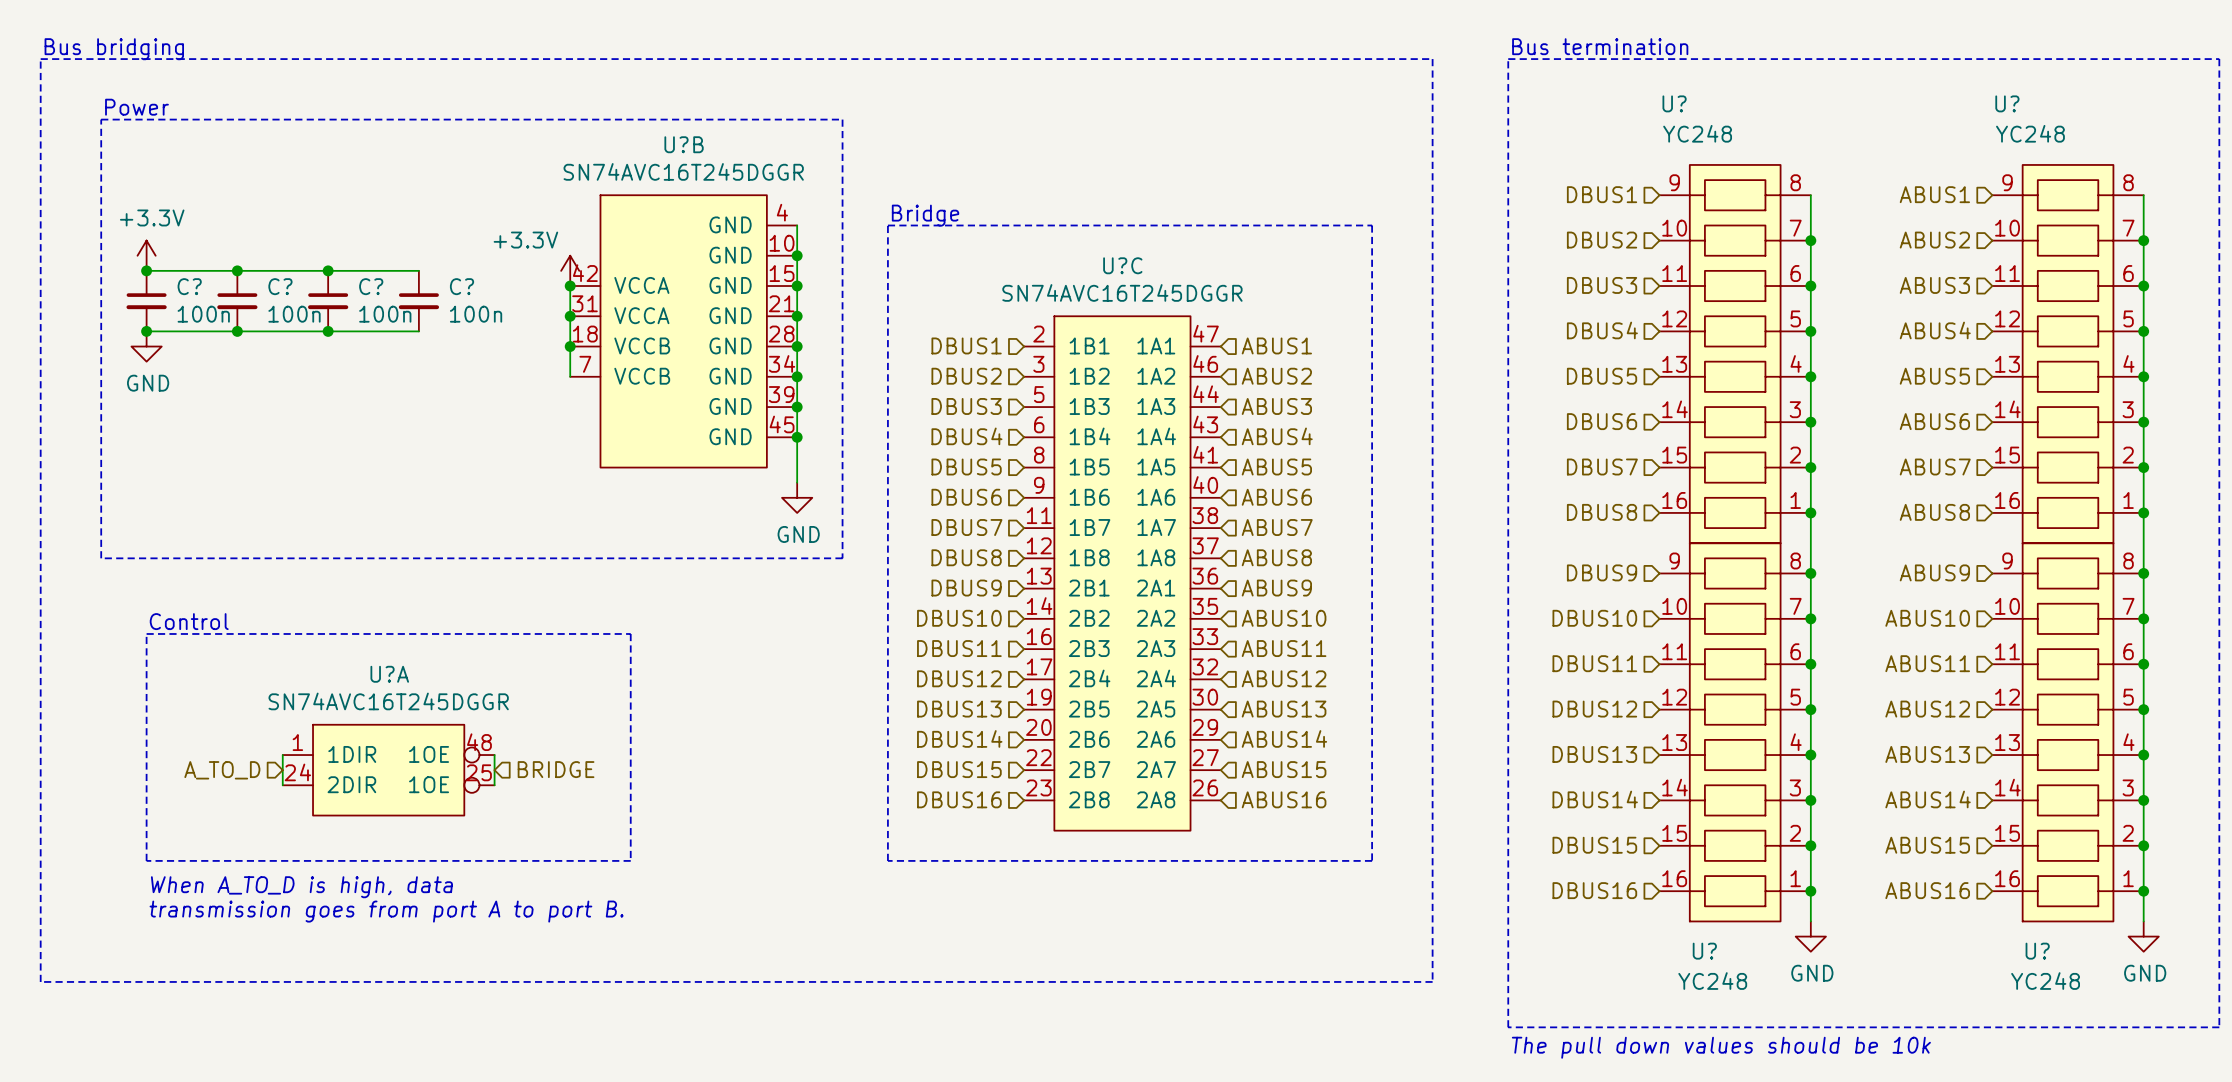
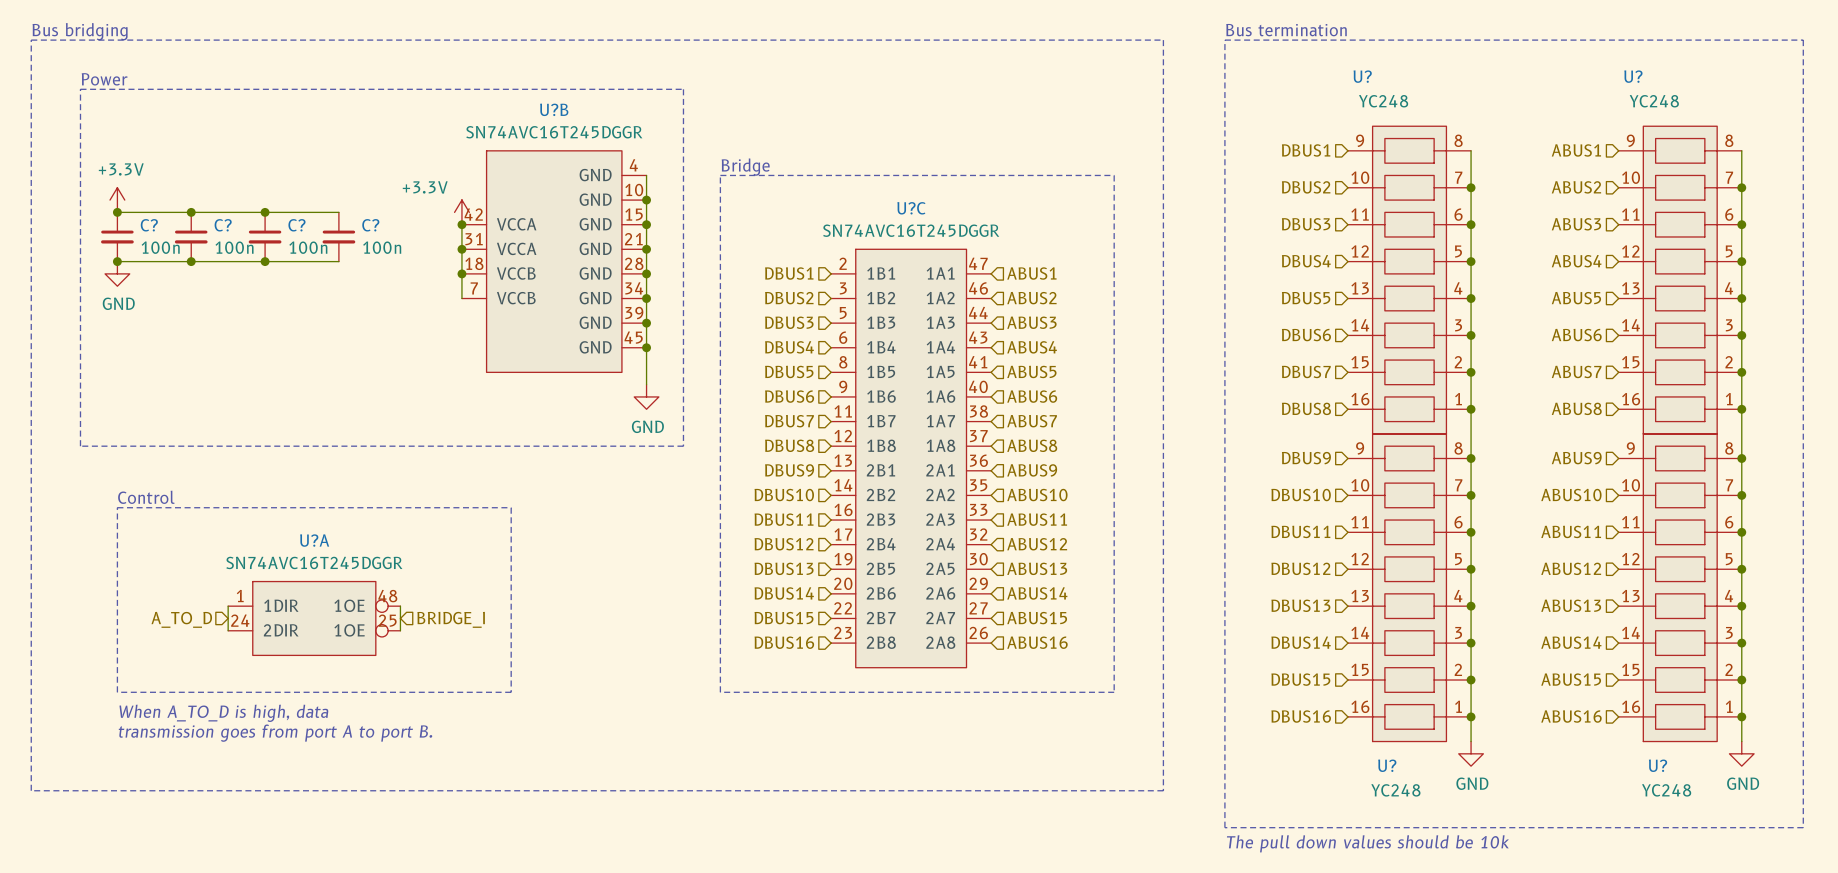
hierarchical label: BRIDGE (556, 769) -> BRIDGE_I (451, 619)

